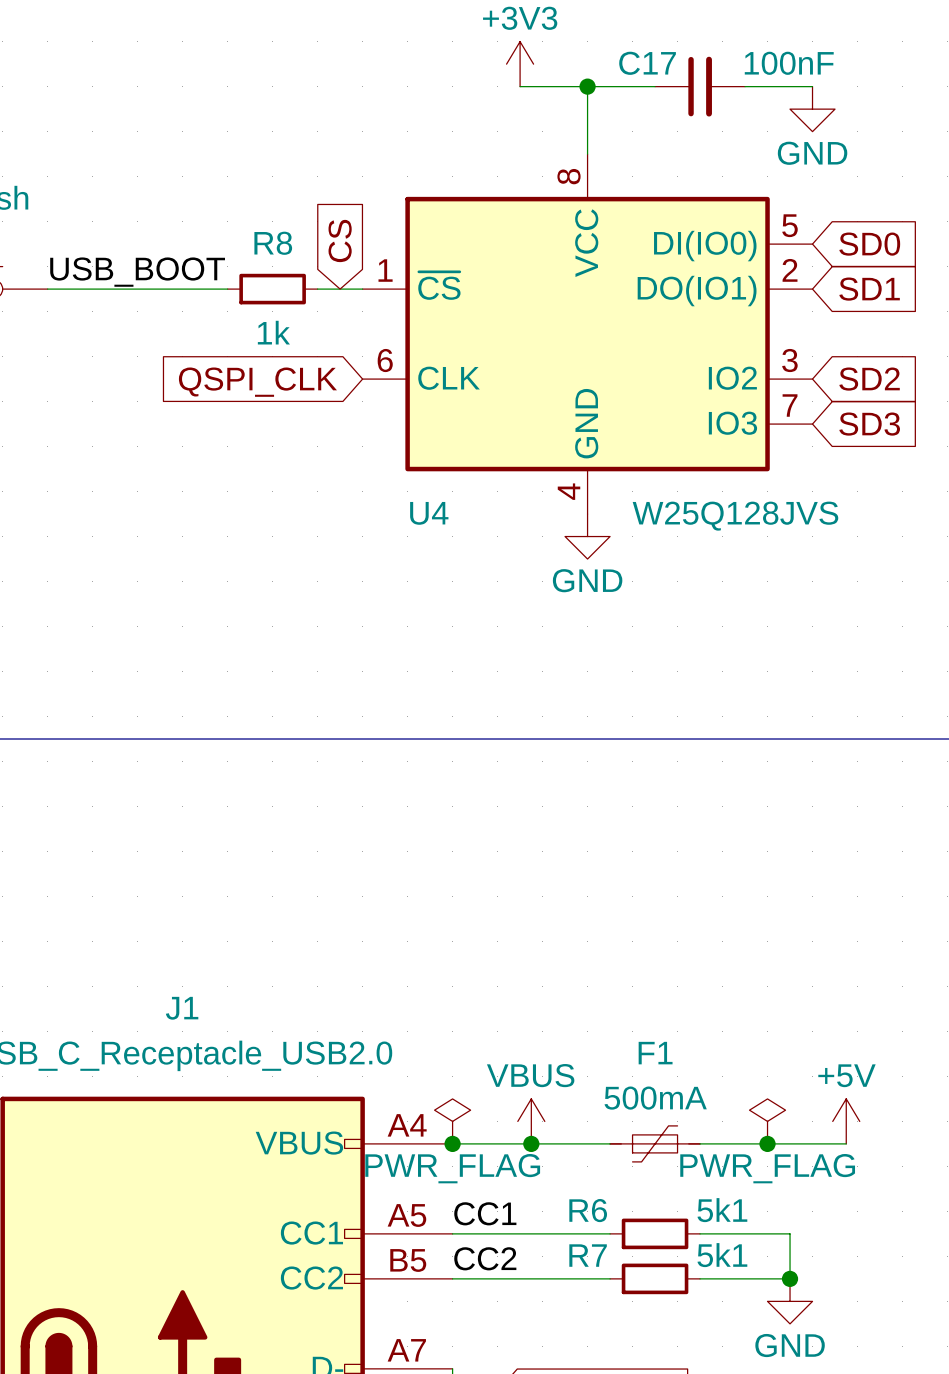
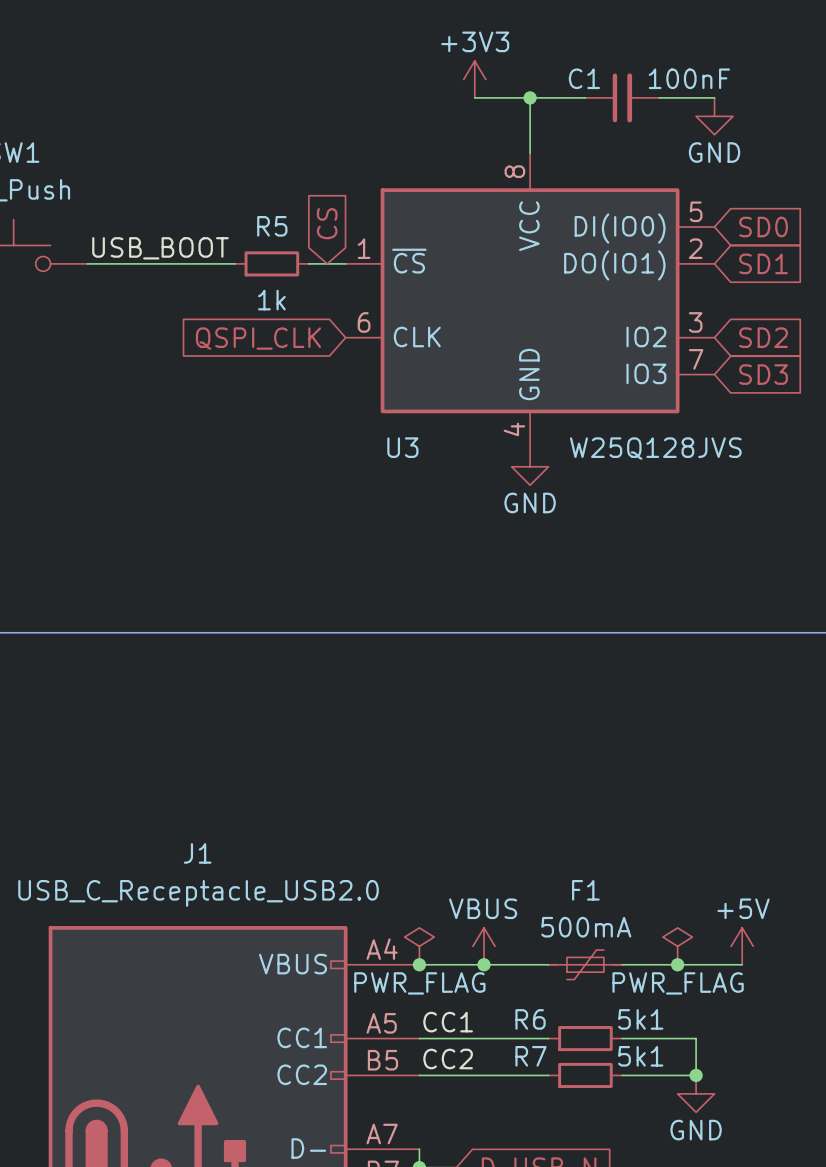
C17 name: C17 (647, 63) -> C1 (584, 78)
R8 name: R8 (273, 243) -> R5 (272, 226)
U4 name: U4 (429, 513) -> U3 (402, 447)

